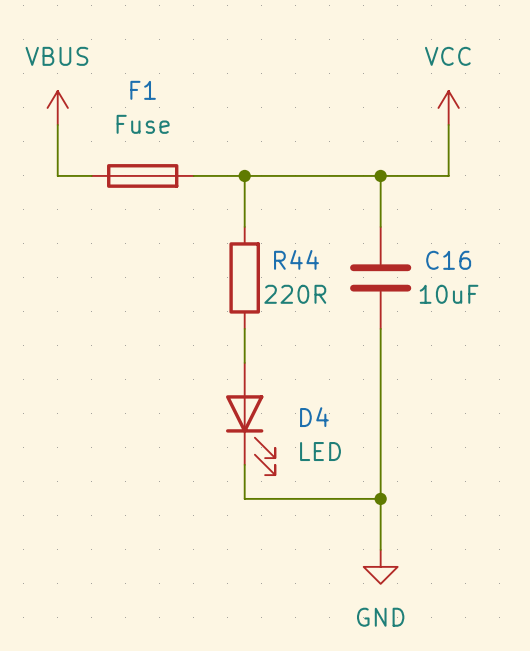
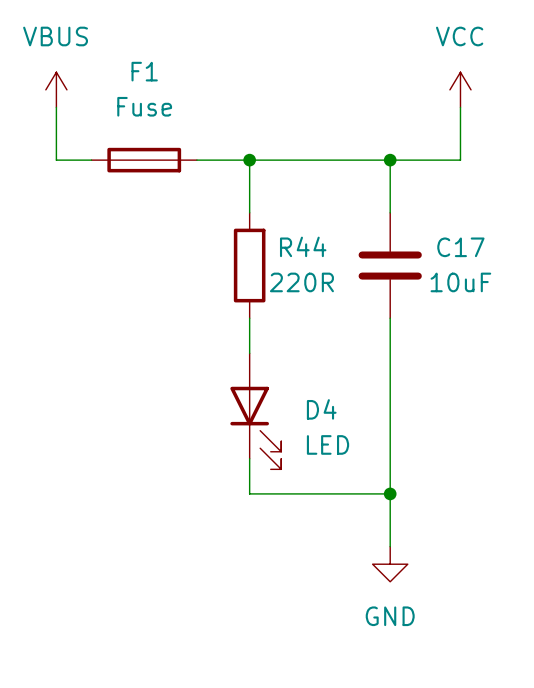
C16 name: C16 (448, 260) -> C17 (460, 247)

